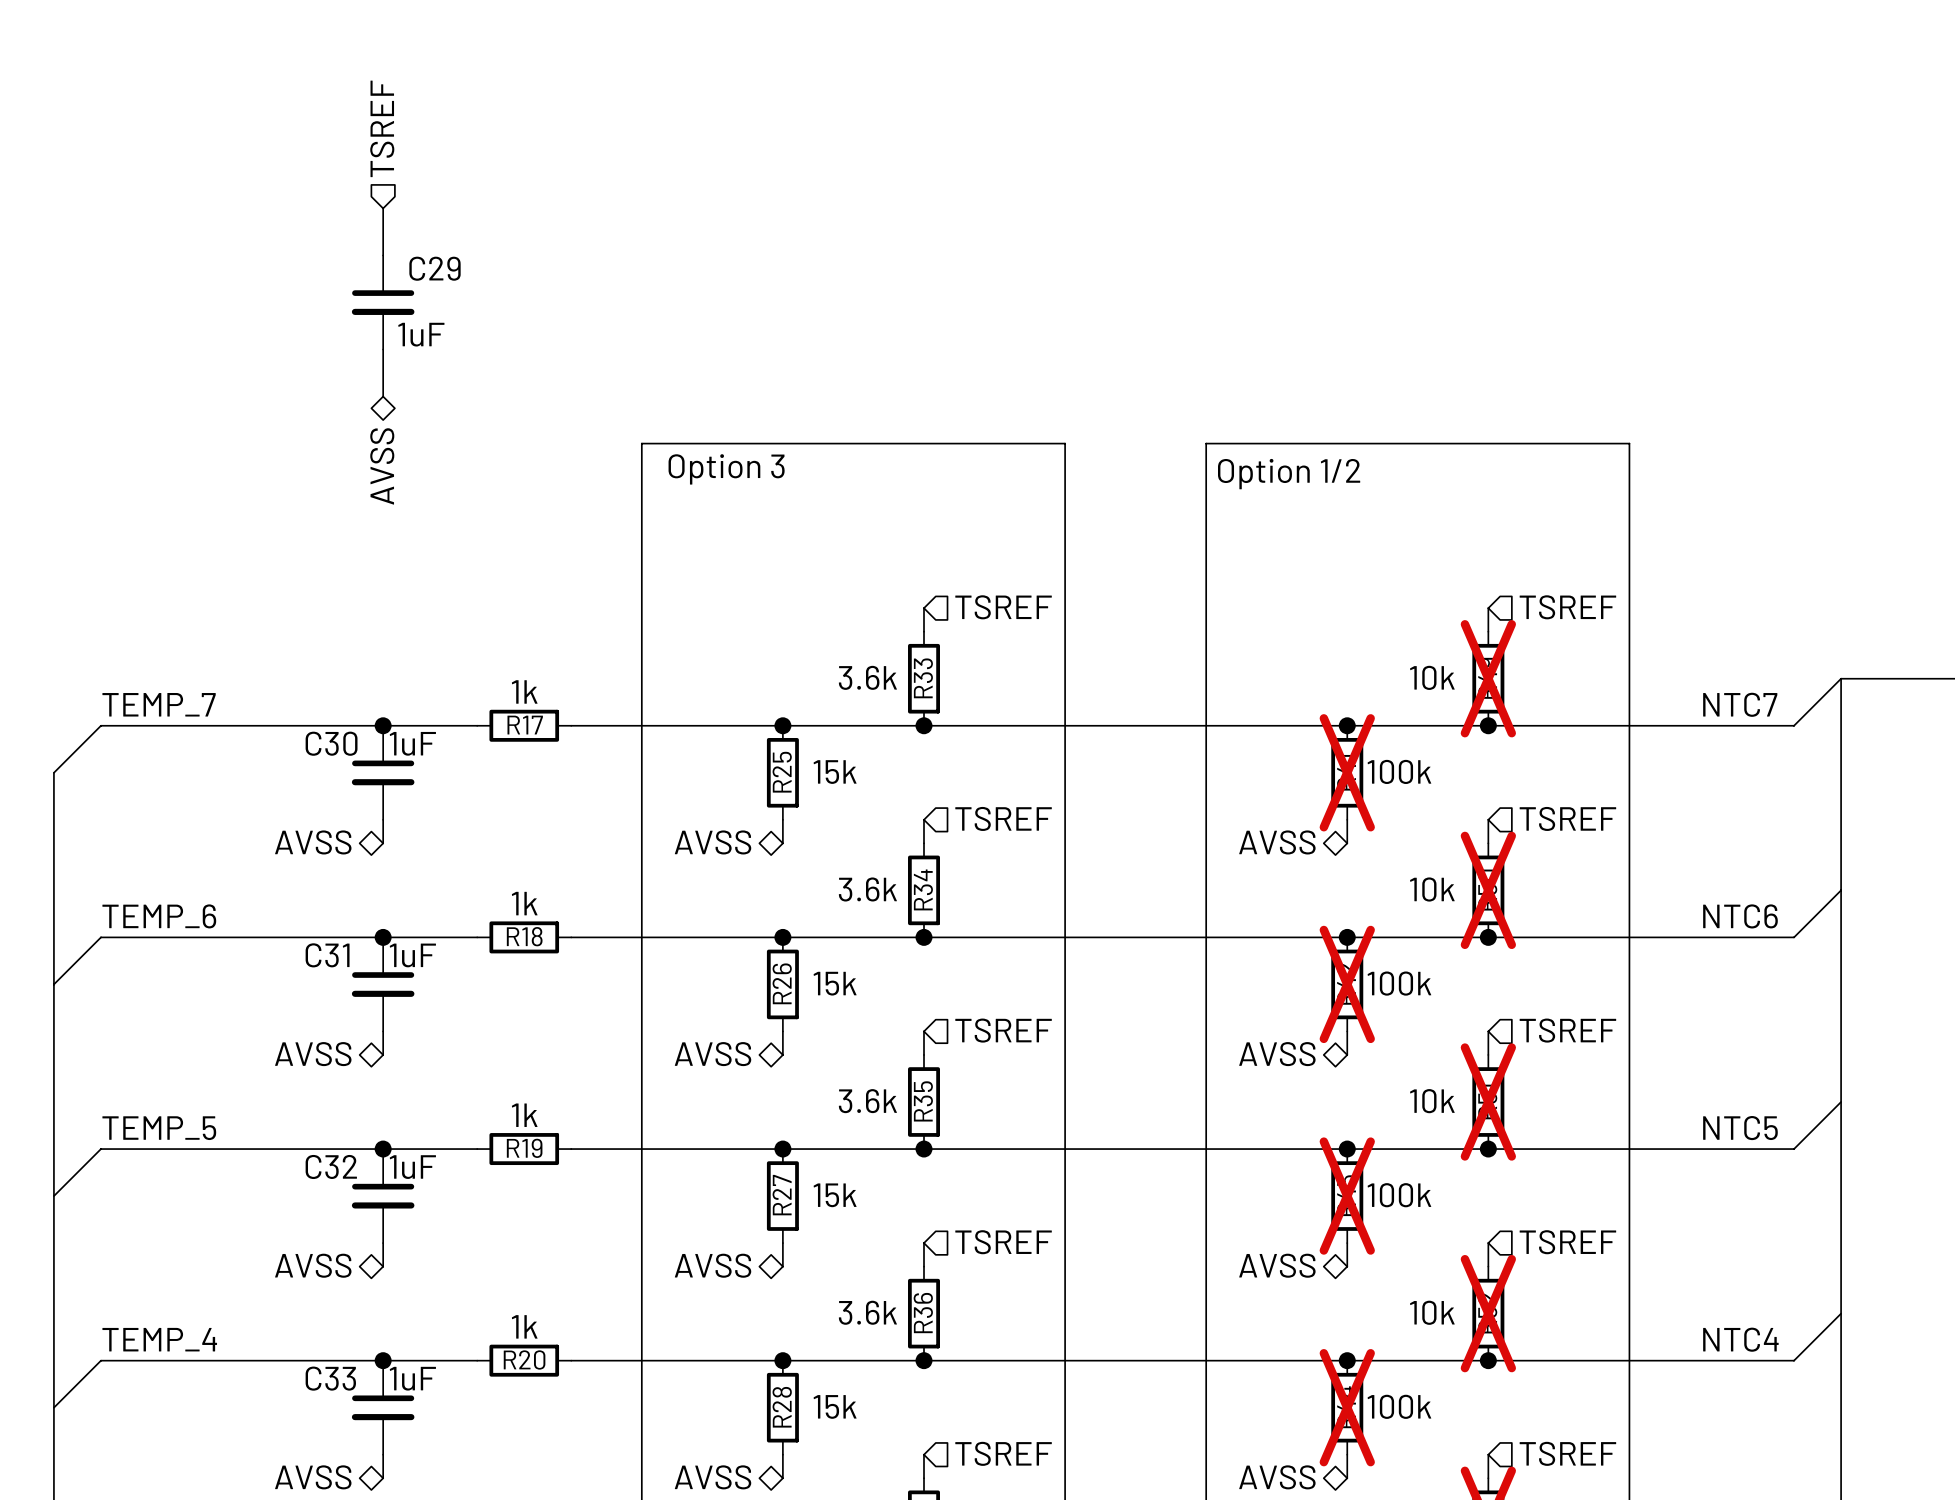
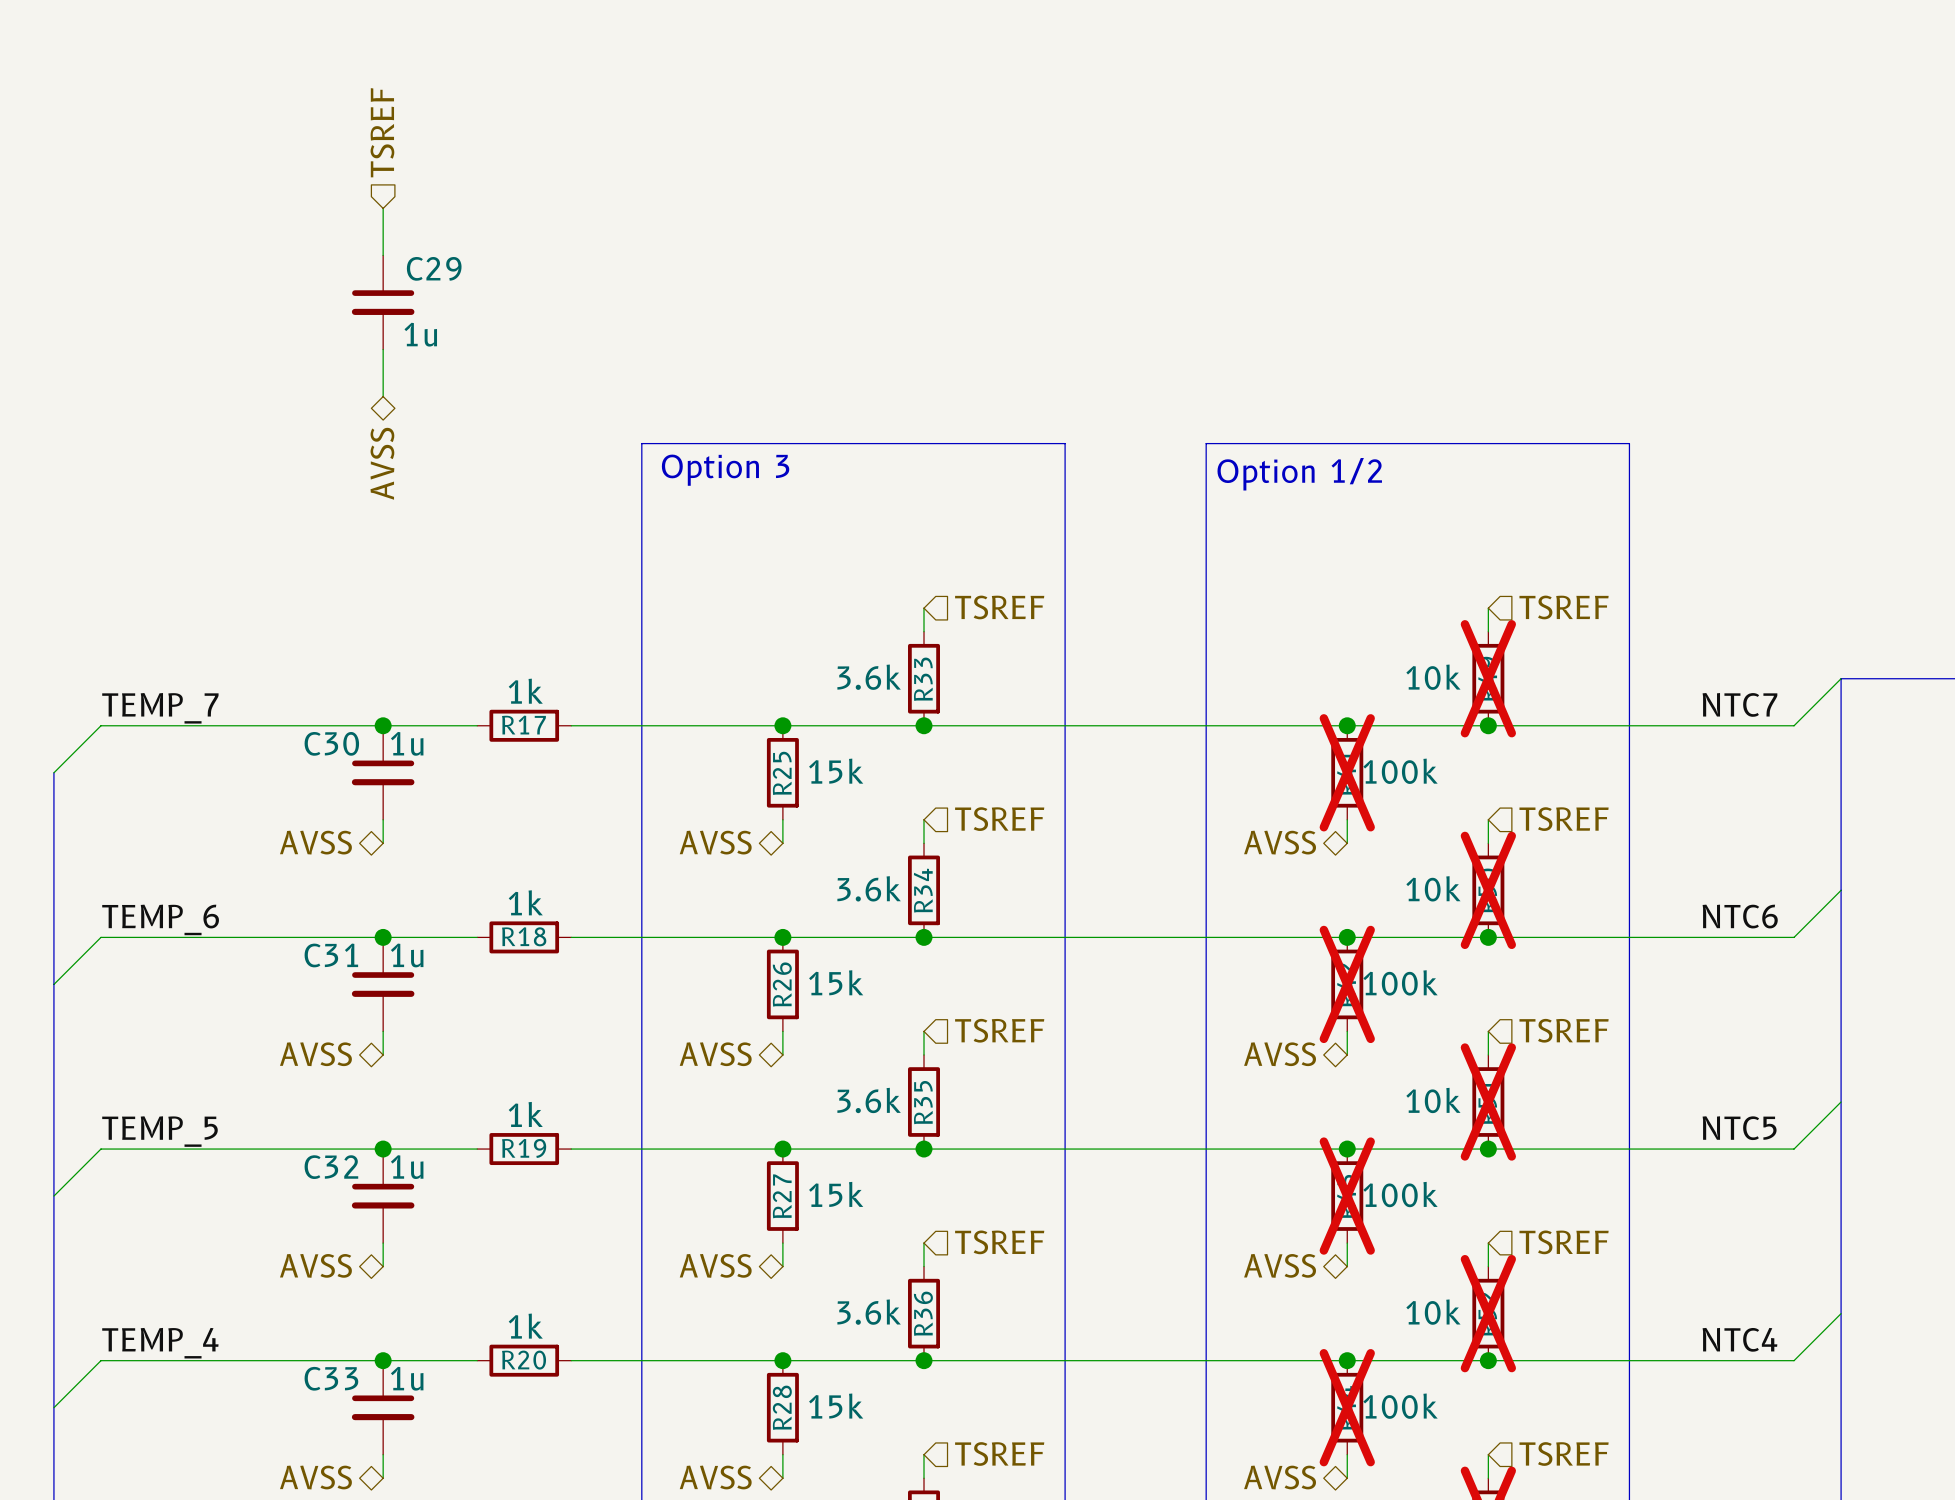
C29 value: 1uF (421, 334) -> 1u (420, 334)
C30 value: 1uF (412, 743) -> 1u (407, 743)
C31 value: 1uF (412, 955) -> 1u (407, 955)
C32 value: 1uF (412, 1167) -> 1u (407, 1167)
C33 value: 1uF (412, 1378) -> 1u (407, 1378)

